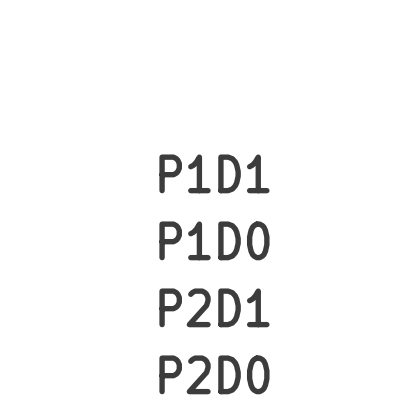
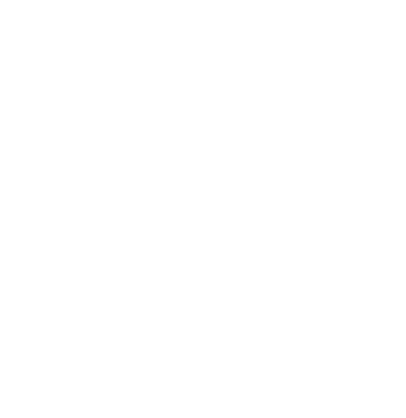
text: P1D1 (214, 173) -> none
text: P1D0 (214, 240) -> none
text: P2D1 (214, 307) -> none
text: P2D0 (214, 374) -> none

